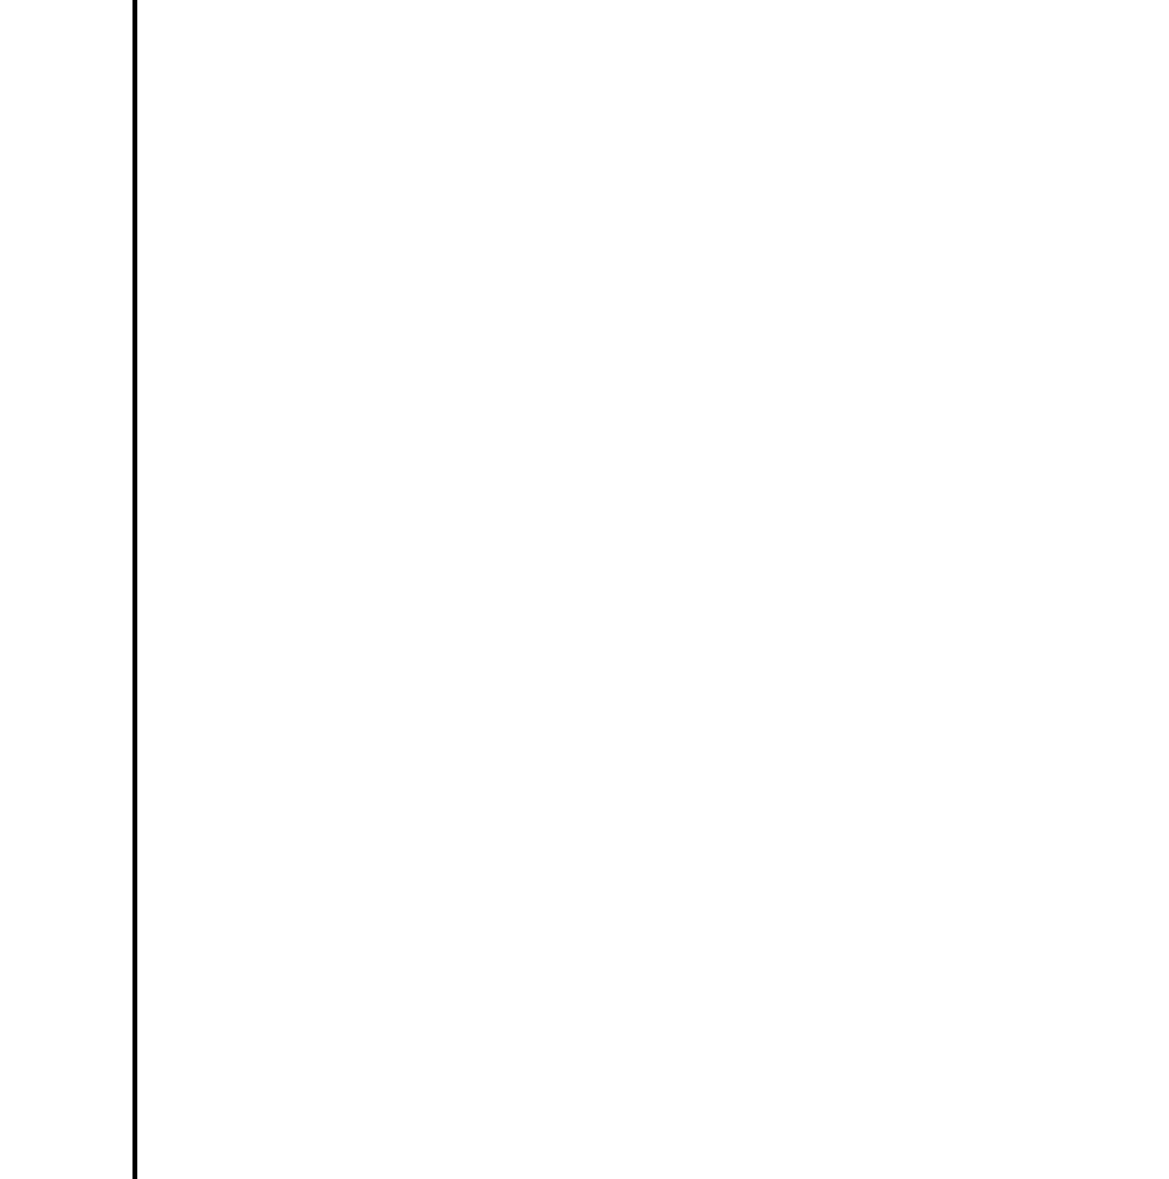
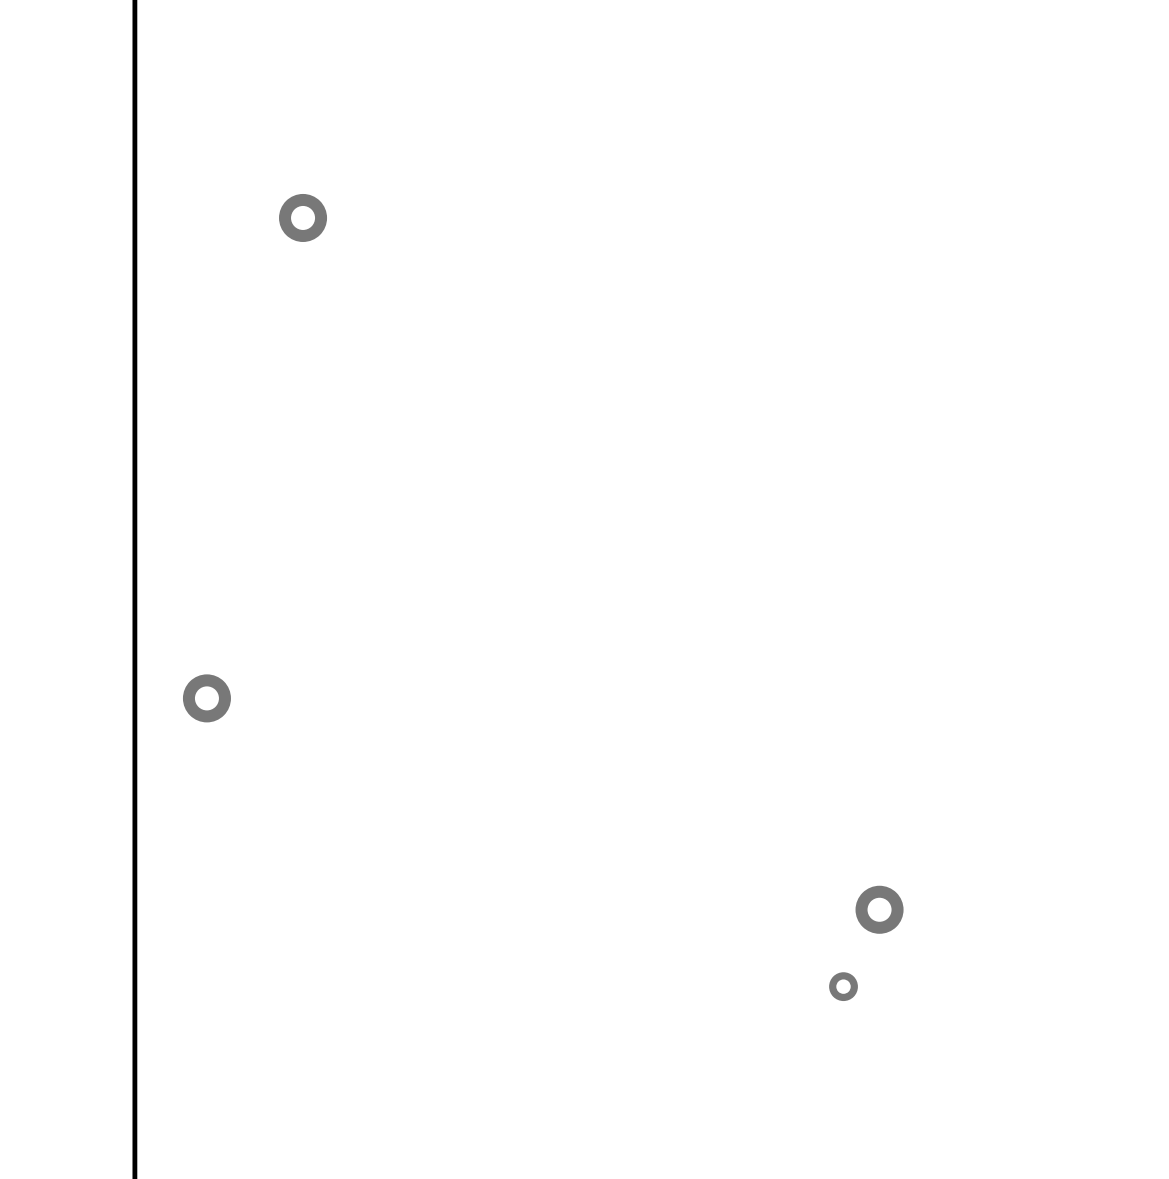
via: none -> (303, 217)
via: none -> (206, 698)
via: none -> (879, 909)
via: none -> (843, 986)

